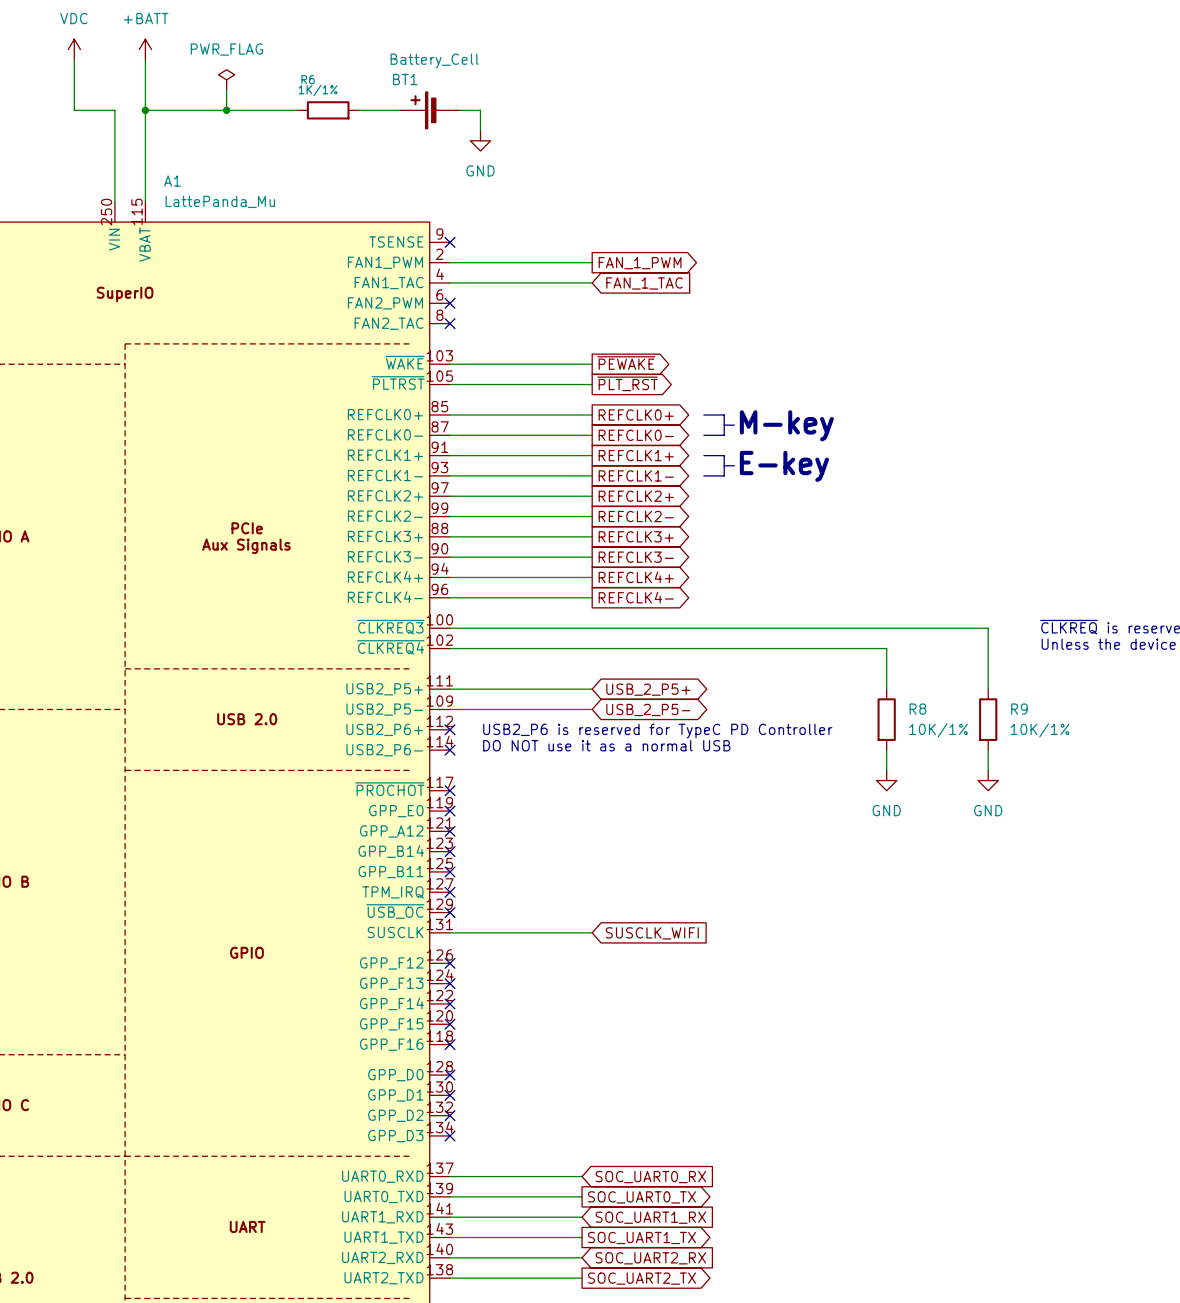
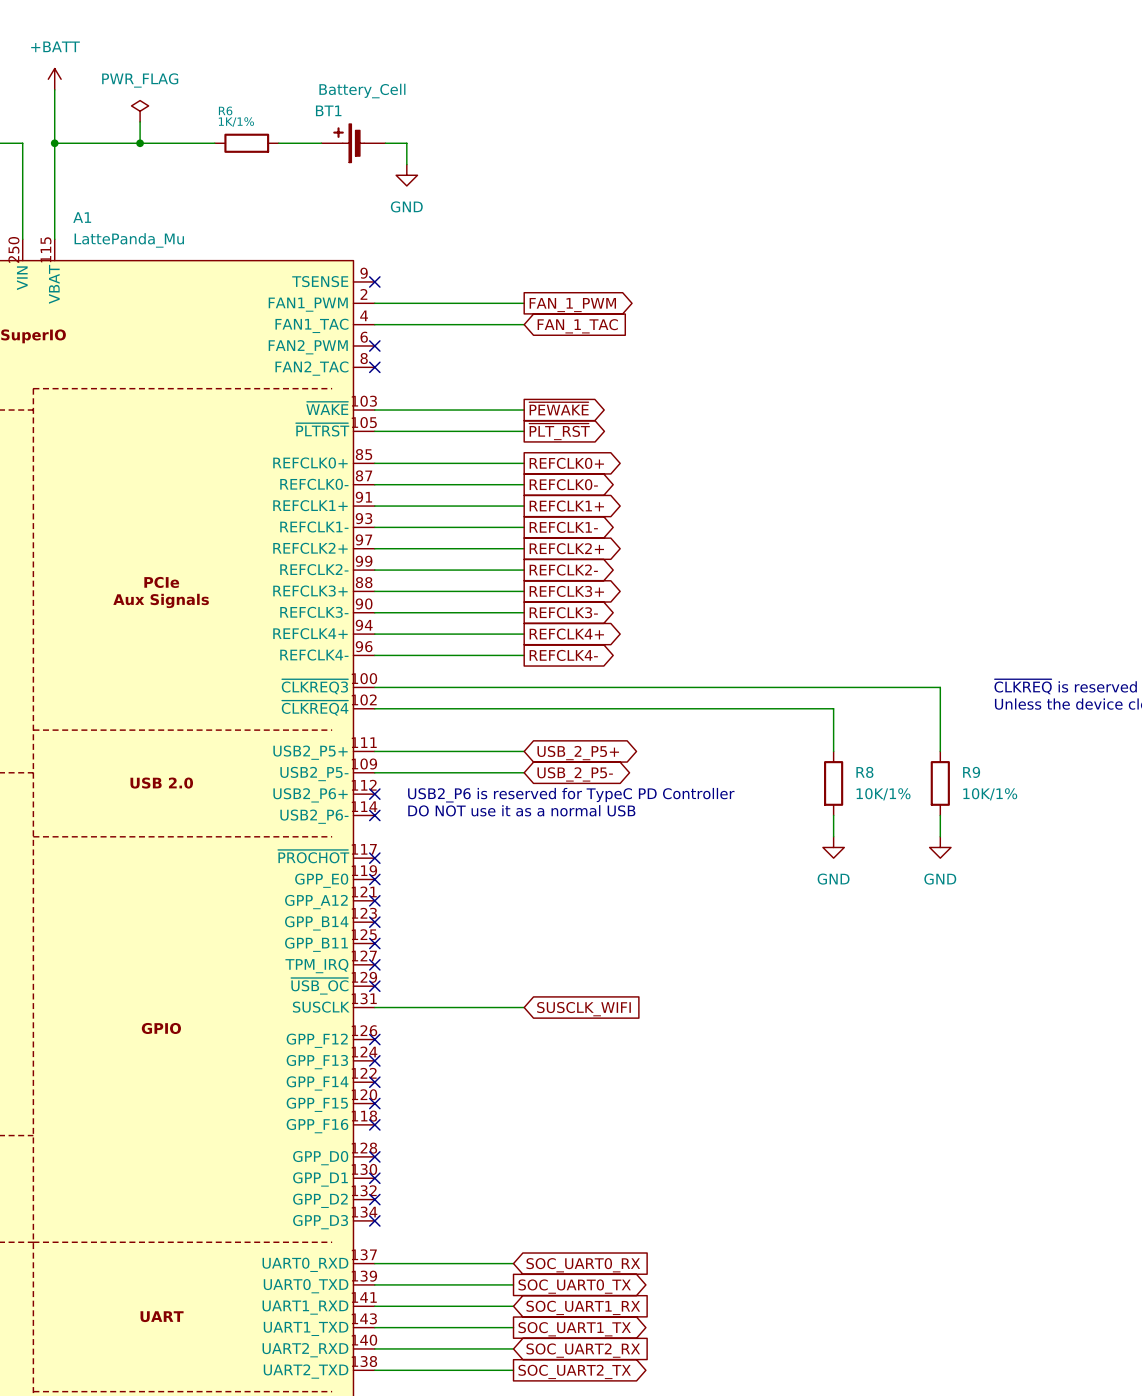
line: (703, 414) (724, 414) (724, 435) (703, 435) -> none
line: (724, 425) (734, 425) -> none
text: M-key (786, 425) -> none
line: (703, 455) (724, 455) (724, 475) (703, 475) -> none
line: (724, 465) (734, 465) -> none
text: E-key (784, 466) -> none

